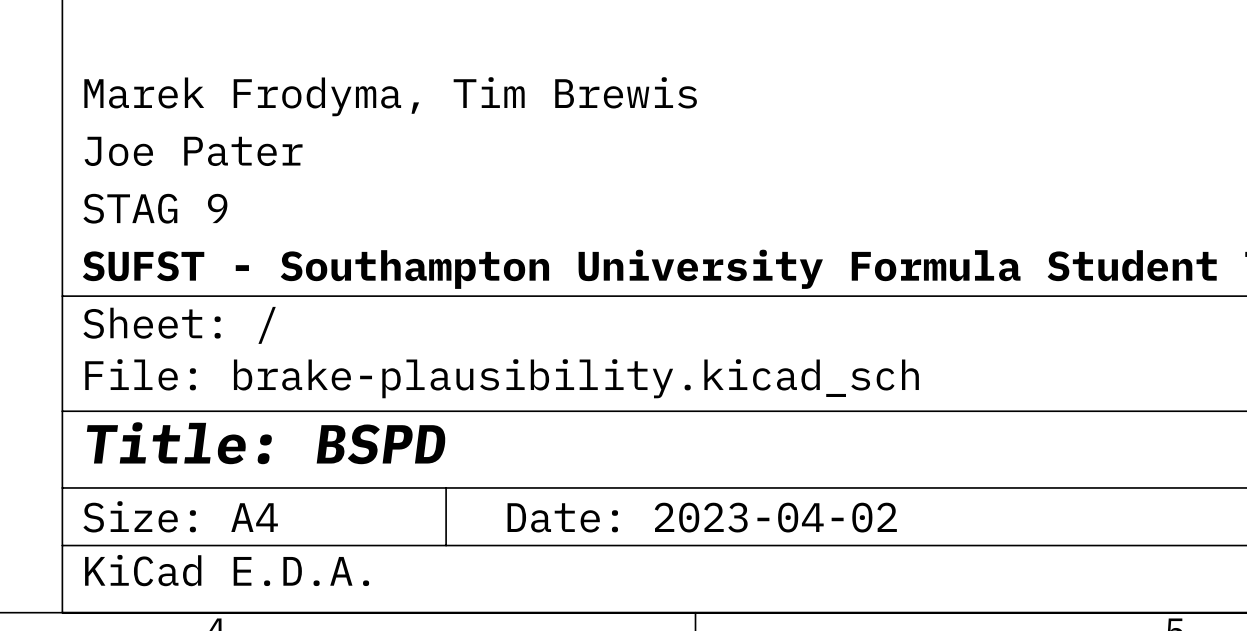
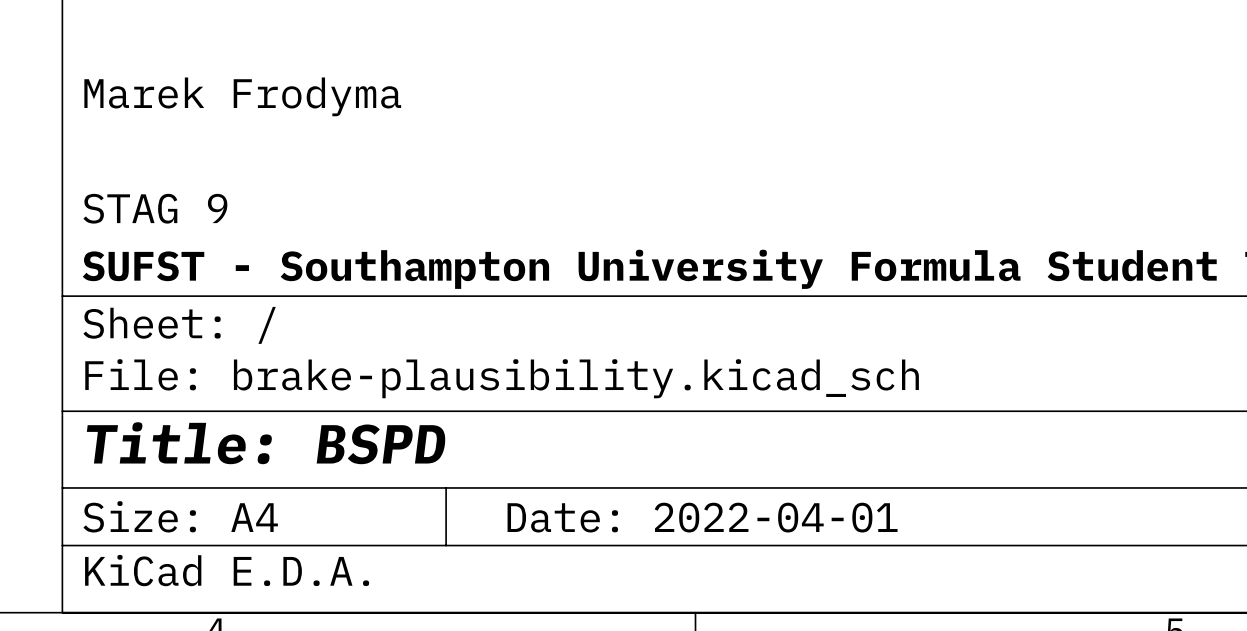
title block: Marek Frodyma, Tim Brewis (390, 96) -> Marek Frodyma (242, 96)
title block: Joe Pater (193, 151) -> none
title block: Date: 2023-04-02 (702, 517) -> Date: 2022-04-01 (702, 517)

